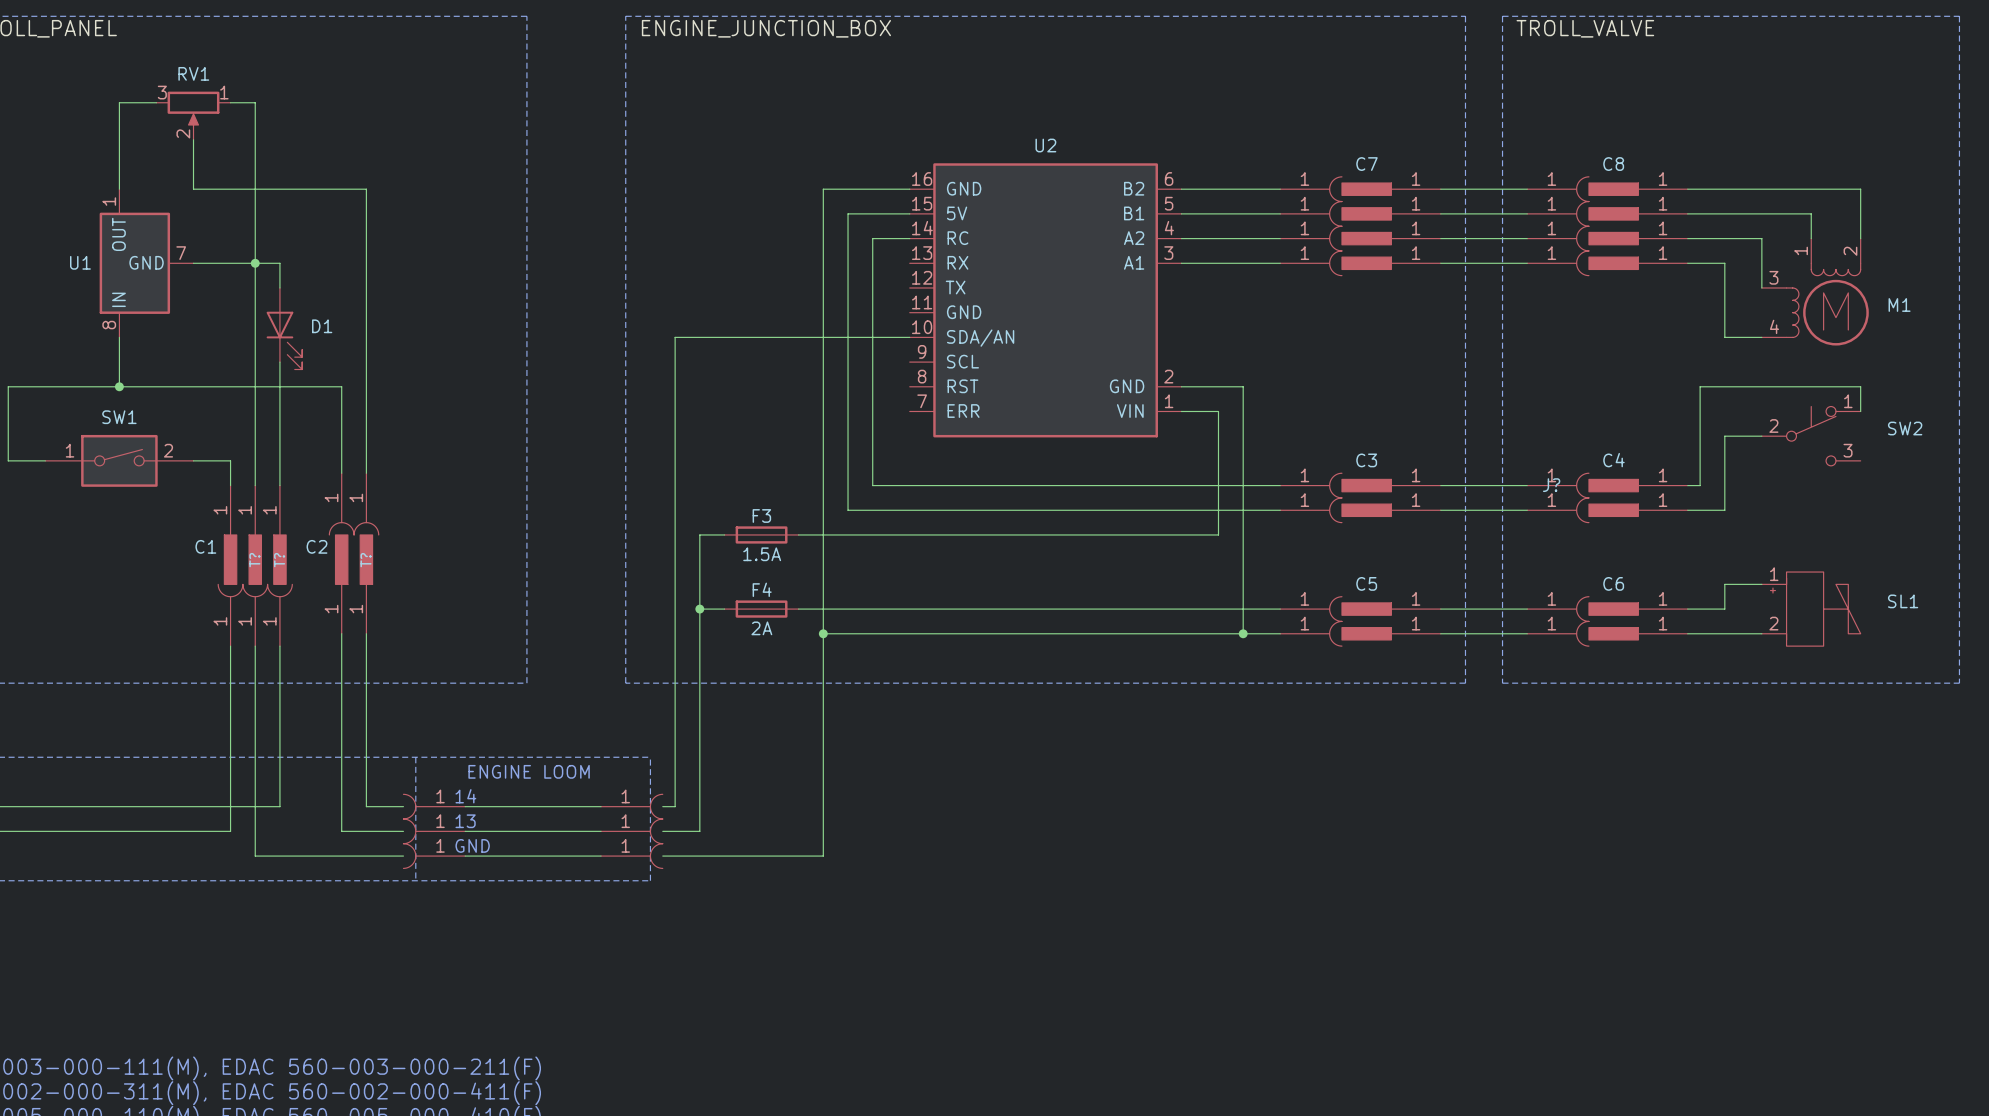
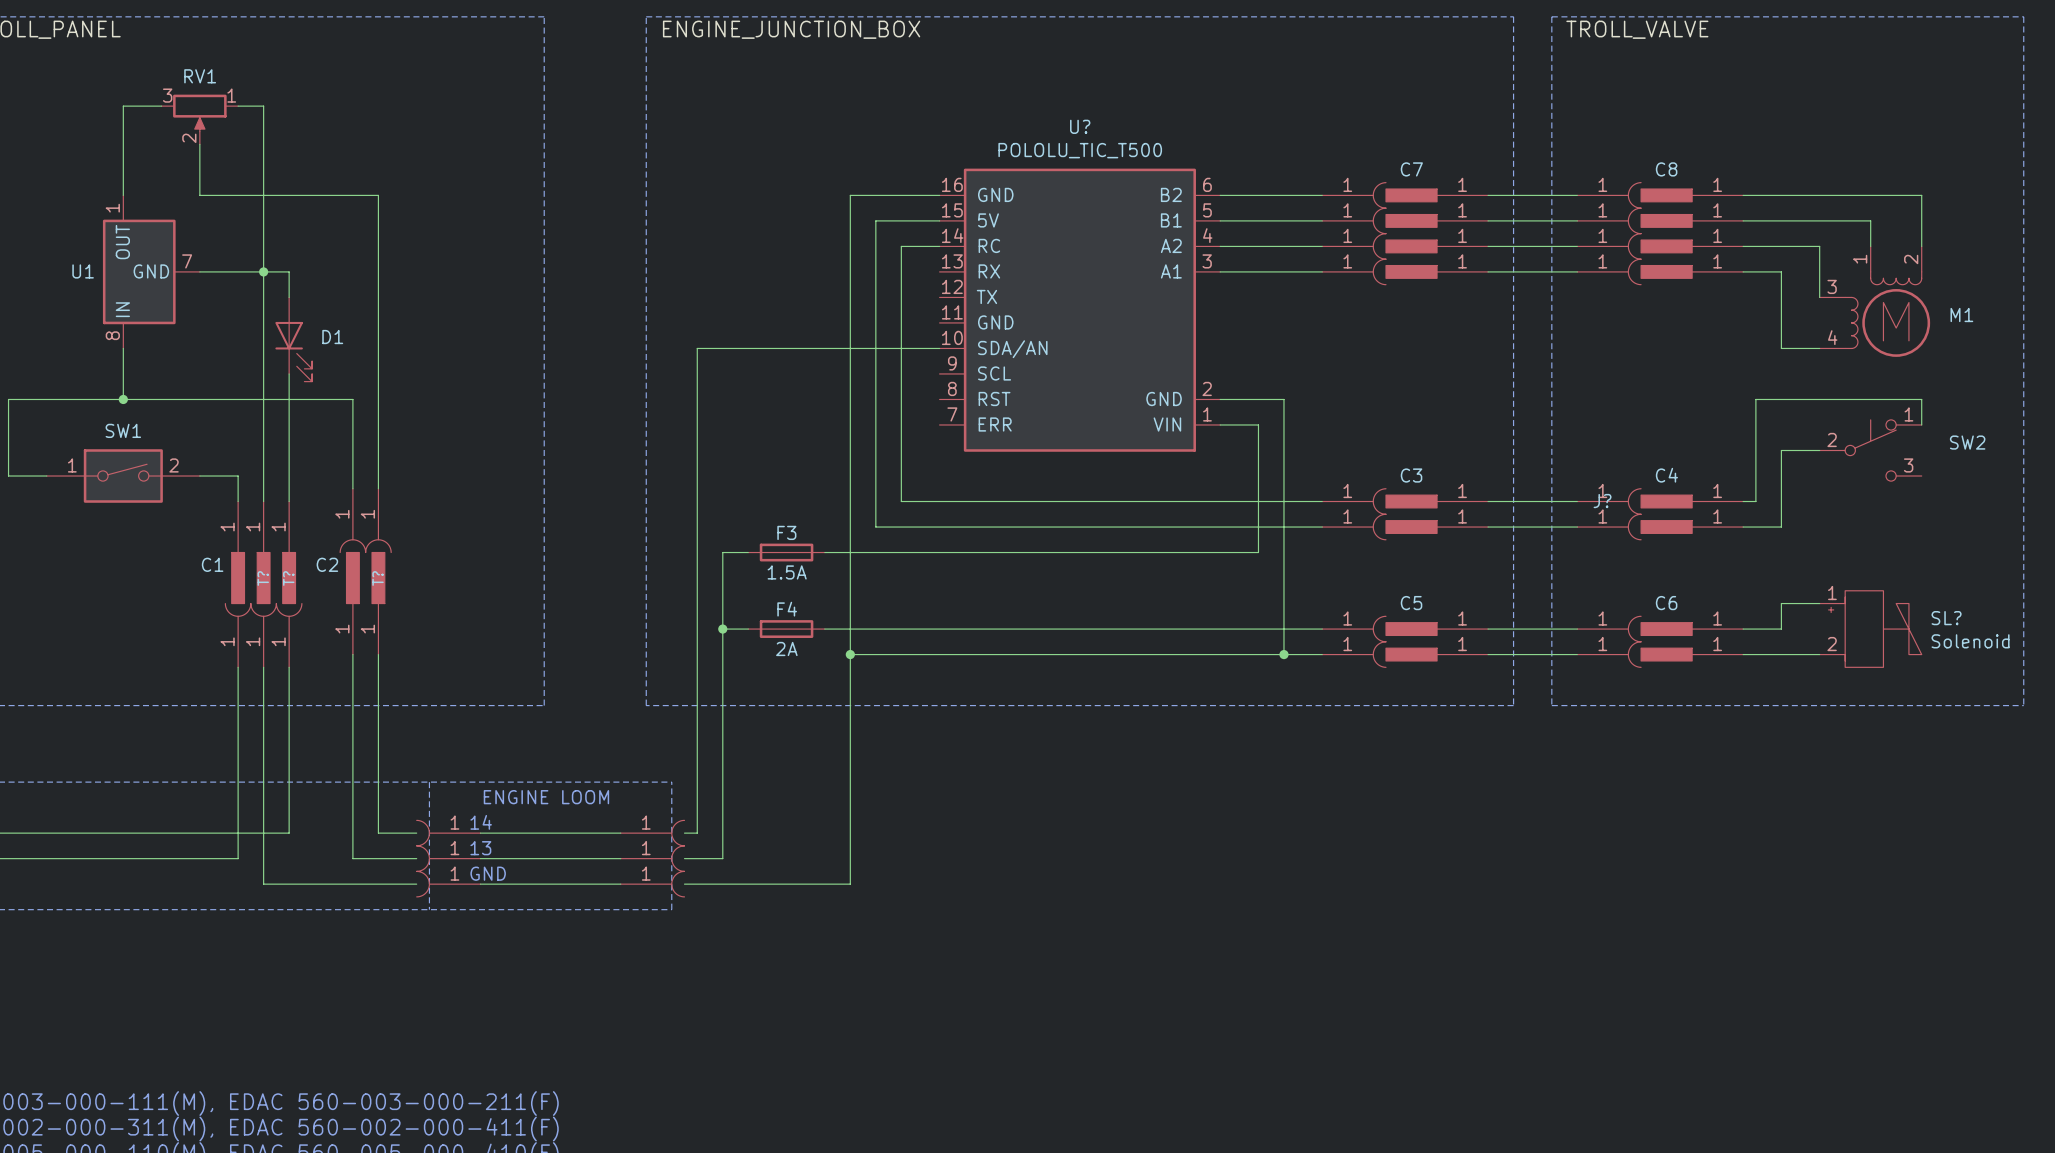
U2 name: U2 (1045, 145) -> U? (1080, 126)
U2 value: none -> POLOLU_TIC_T500 (1080, 150)
SL? name: none -> SL? (1946, 618)
SL? value: SL1 (1903, 601) -> Solenoid (1970, 641)

